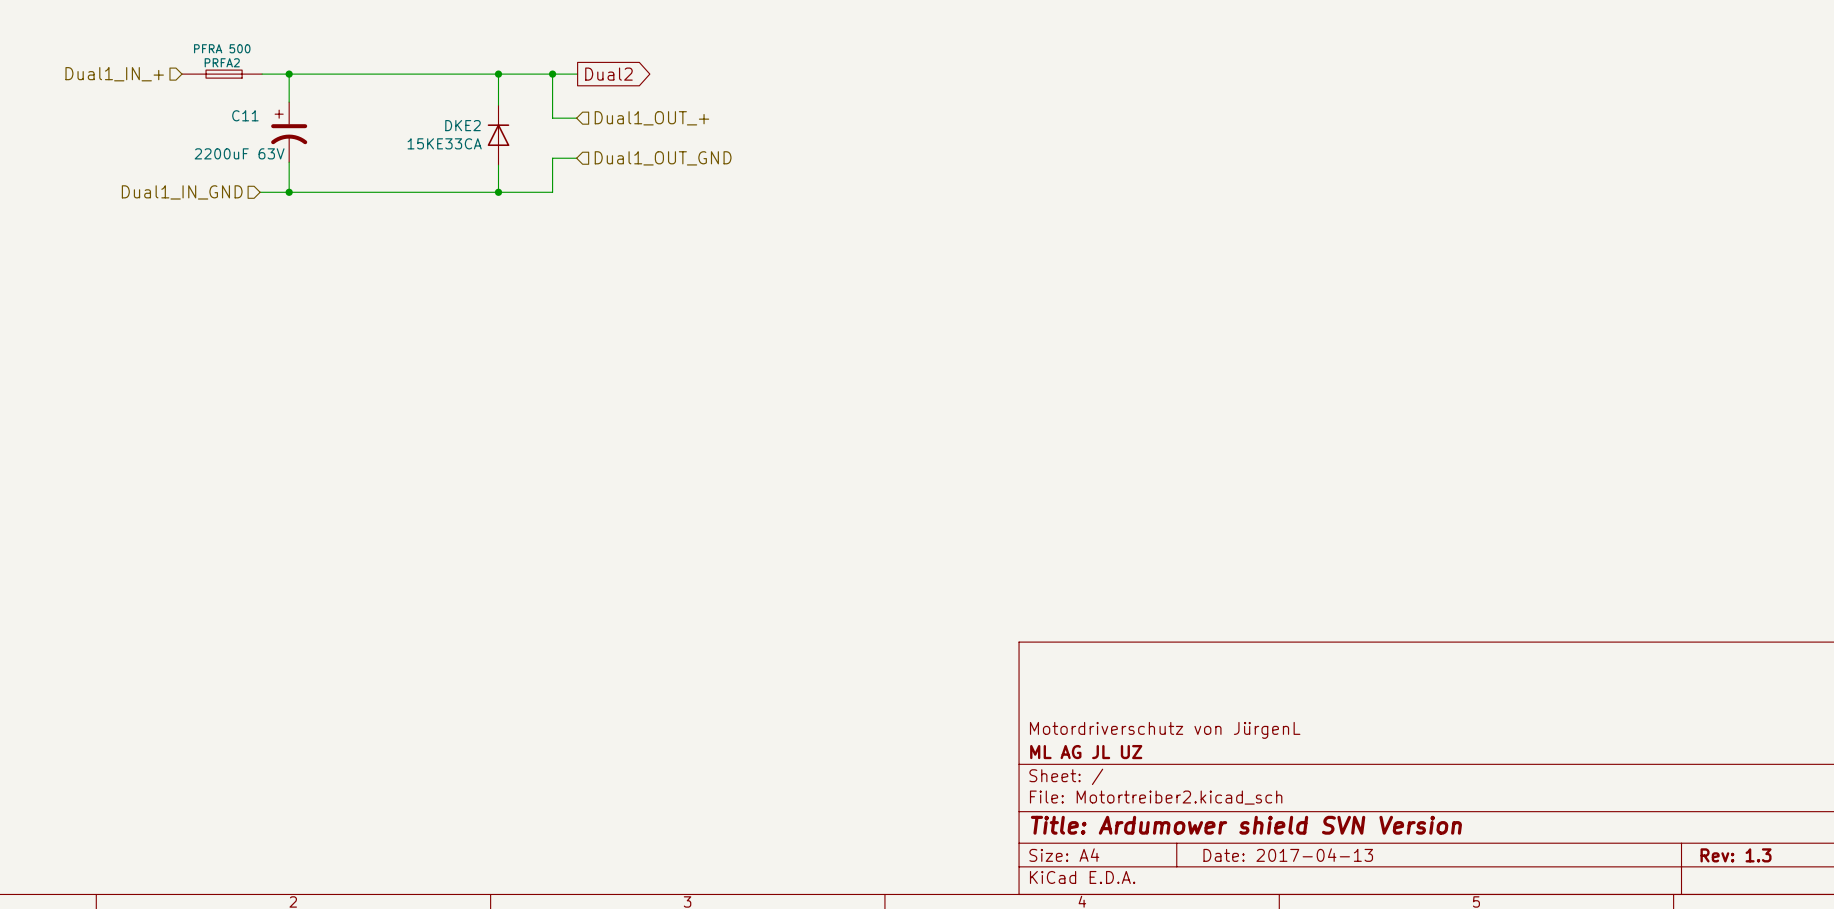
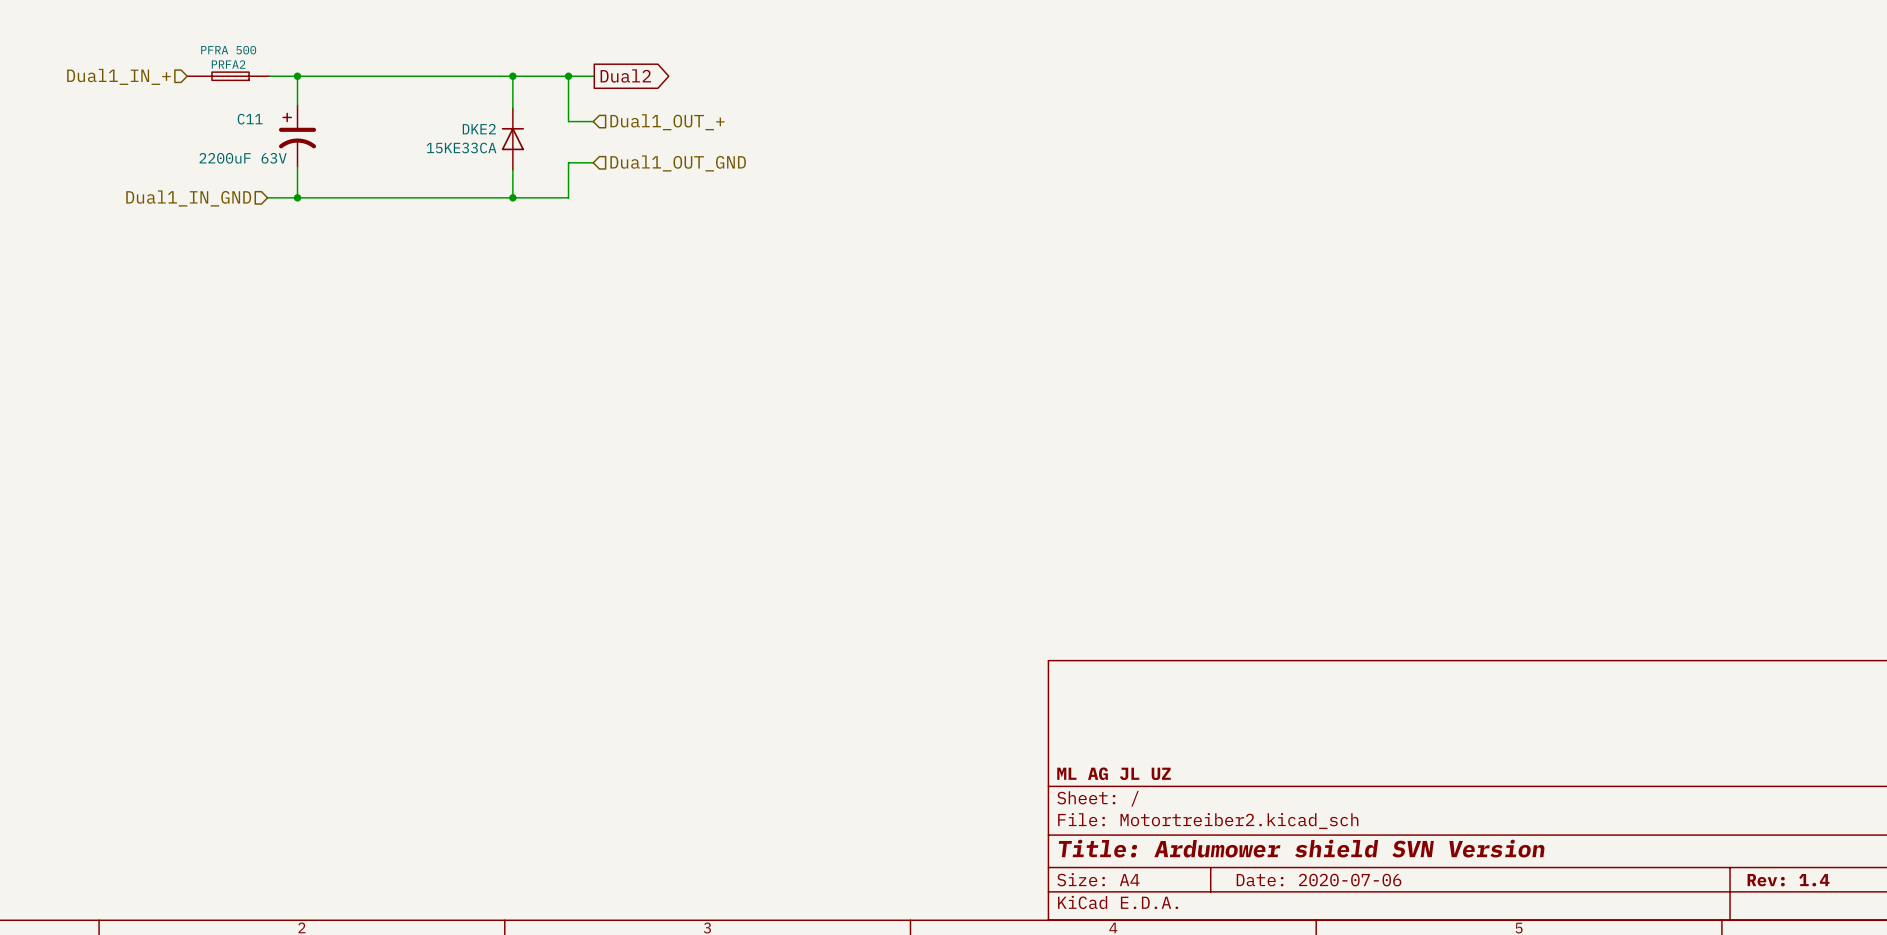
title block: Motordriverschutz von JürgenL (1165, 730) -> none
title block: Date: 2017-04-13 (1288, 855) -> Date: 2020-07-06 (1319, 880)
title block: Rev: 1.3 (1736, 855) -> Rev: 1.4 (1788, 880)

